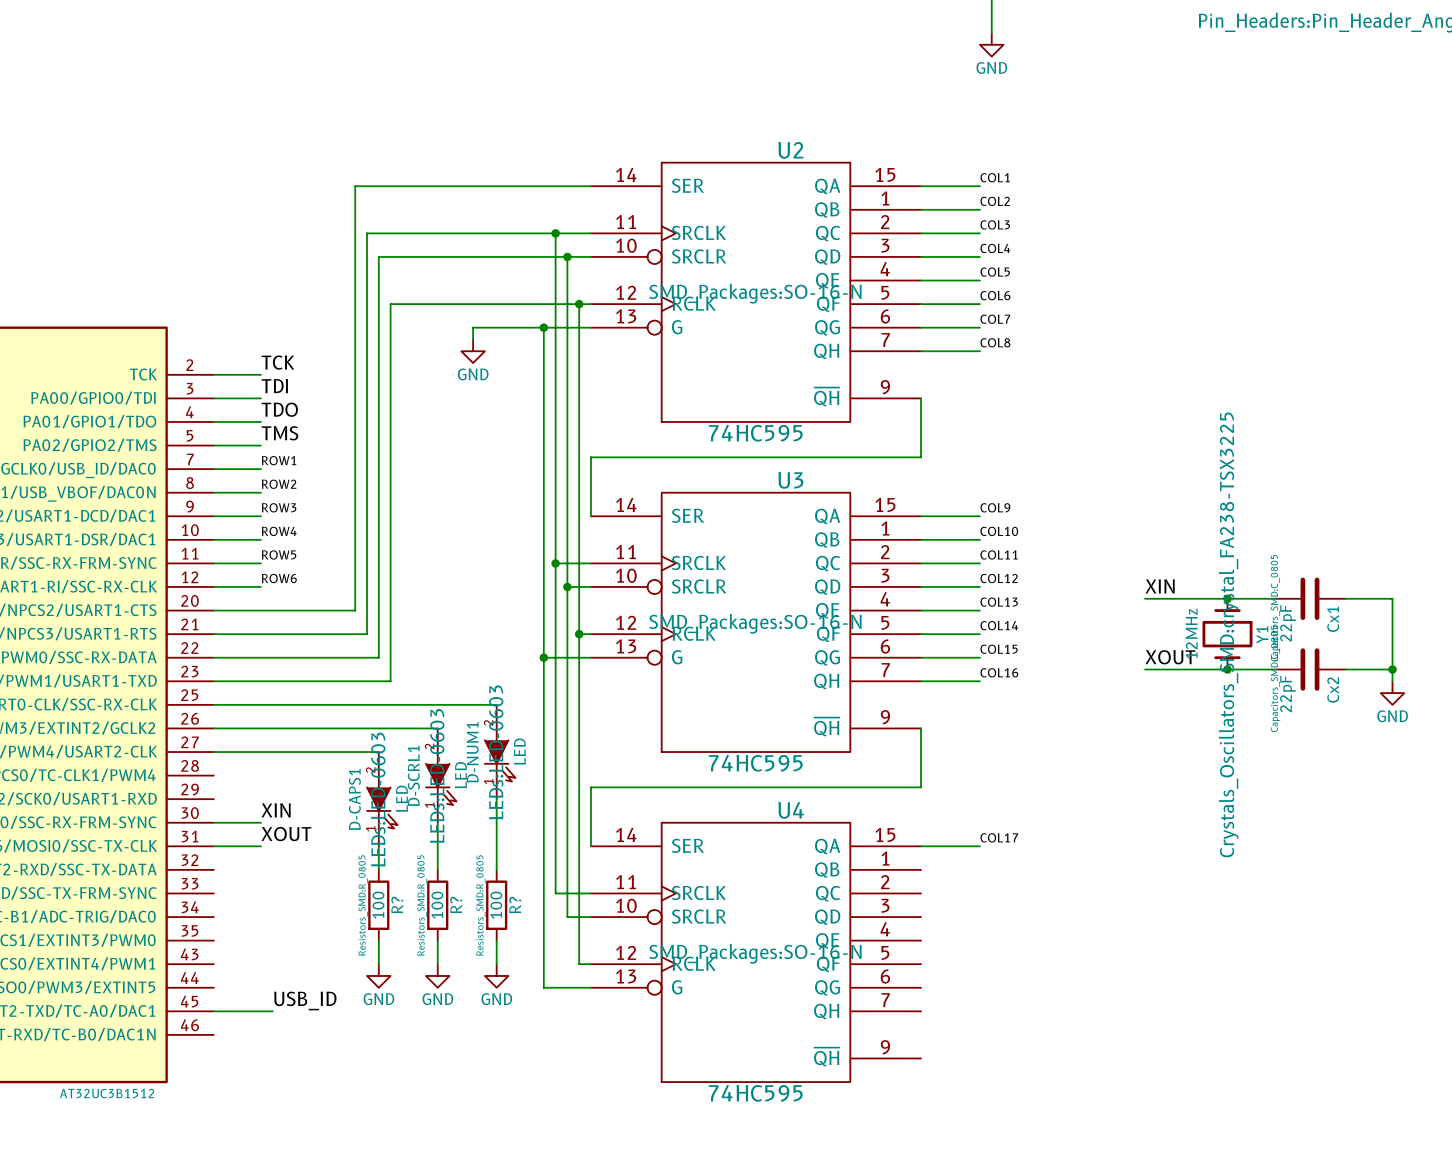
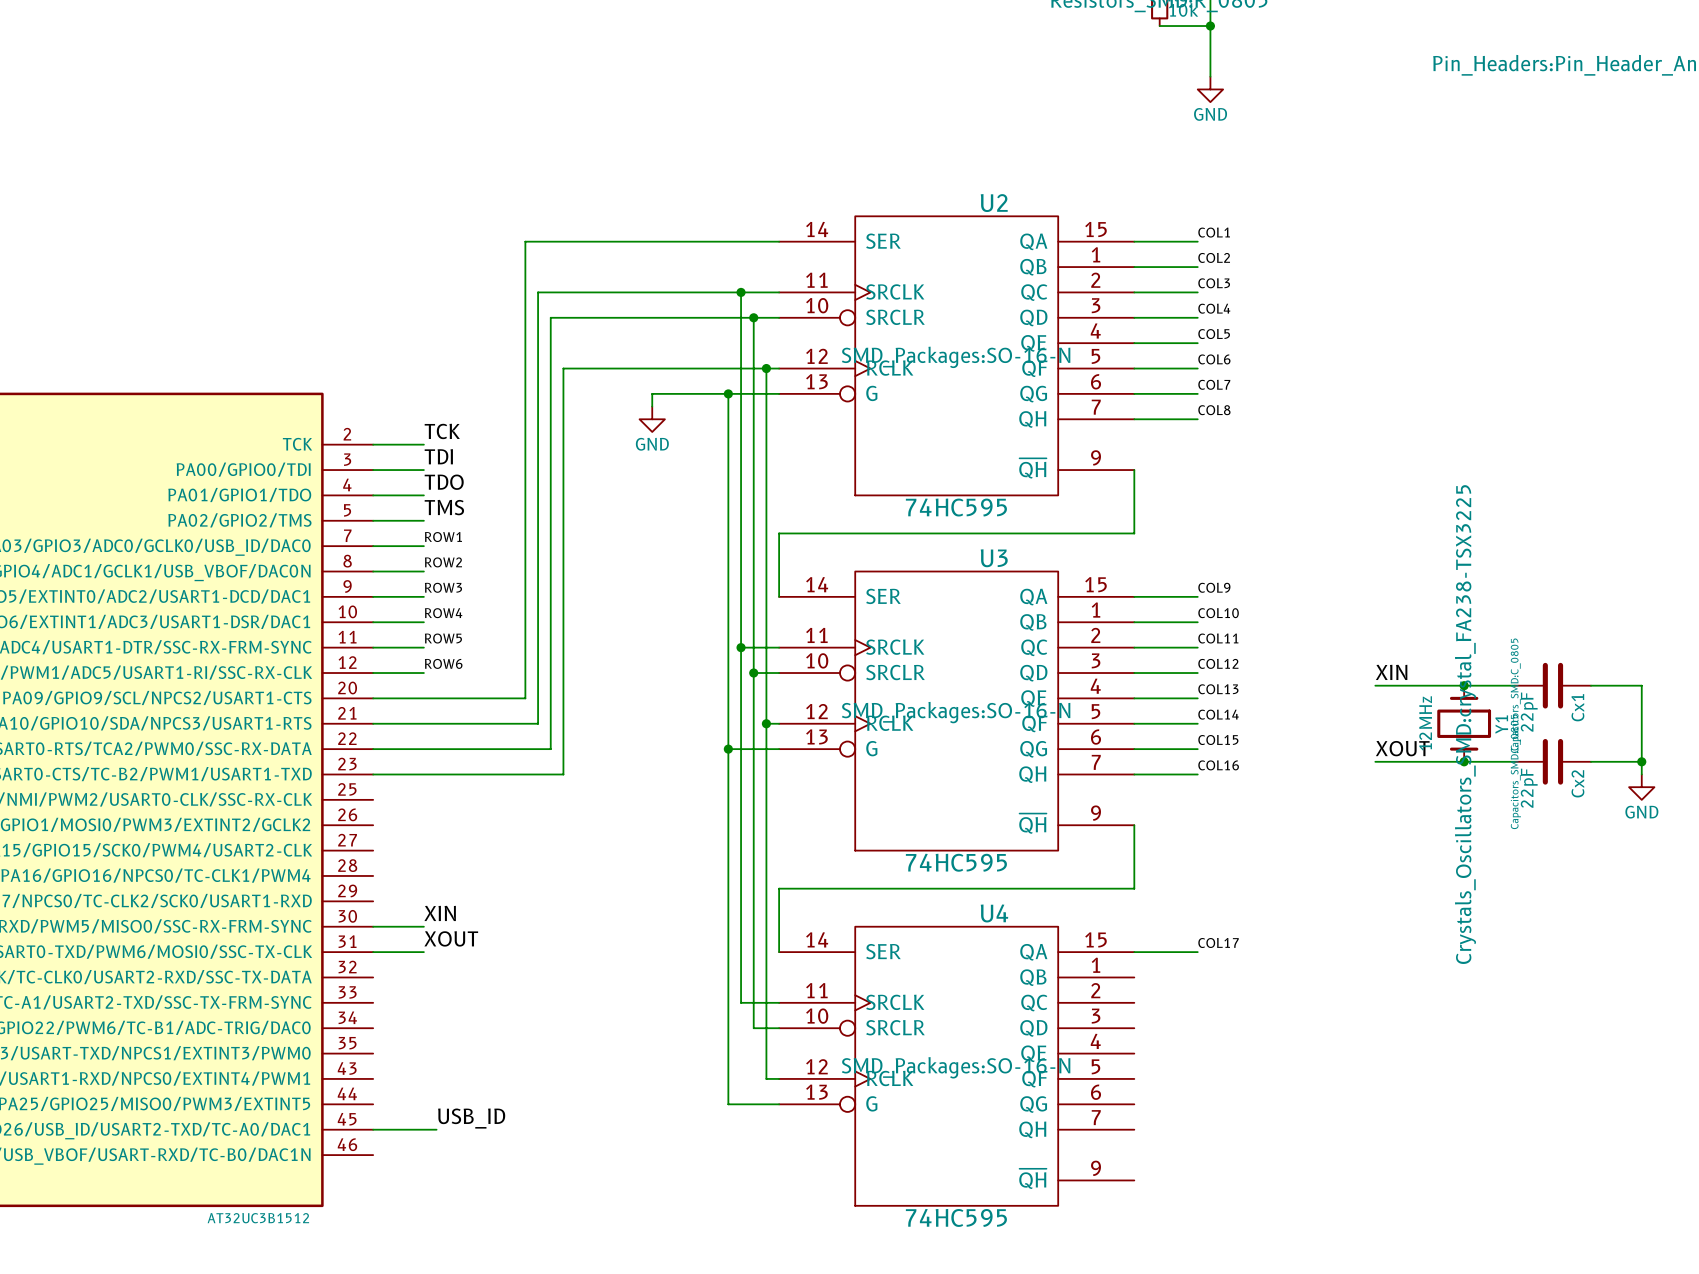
wire: (213, 704) (496, 704) -> none
wire: (213, 728) (437, 728) -> none
wire: (213, 752) (378, 752) -> none
D-NUM1: LED (500, 752) -> none
D-SCRL1: LED (441, 775) -> none
D-CAPS1: LED (382, 799) -> none
wire: (496, 799) (496, 869) -> none
wire: (437, 822) (437, 869) -> none
wire: (378, 846) (378, 869) -> none
R?: 100 (378, 905) -> none
R?: 100 (437, 905) -> none
R?: 100 (496, 905) -> none
wire: (378, 940) (378, 964) -> none
wire: (437, 940) (437, 964) -> none
wire: (496, 940) (496, 964) -> none
power symbol: GND (378, 975) -> none
power symbol: GND (437, 975) -> none
power symbol: GND (496, 975) -> none

